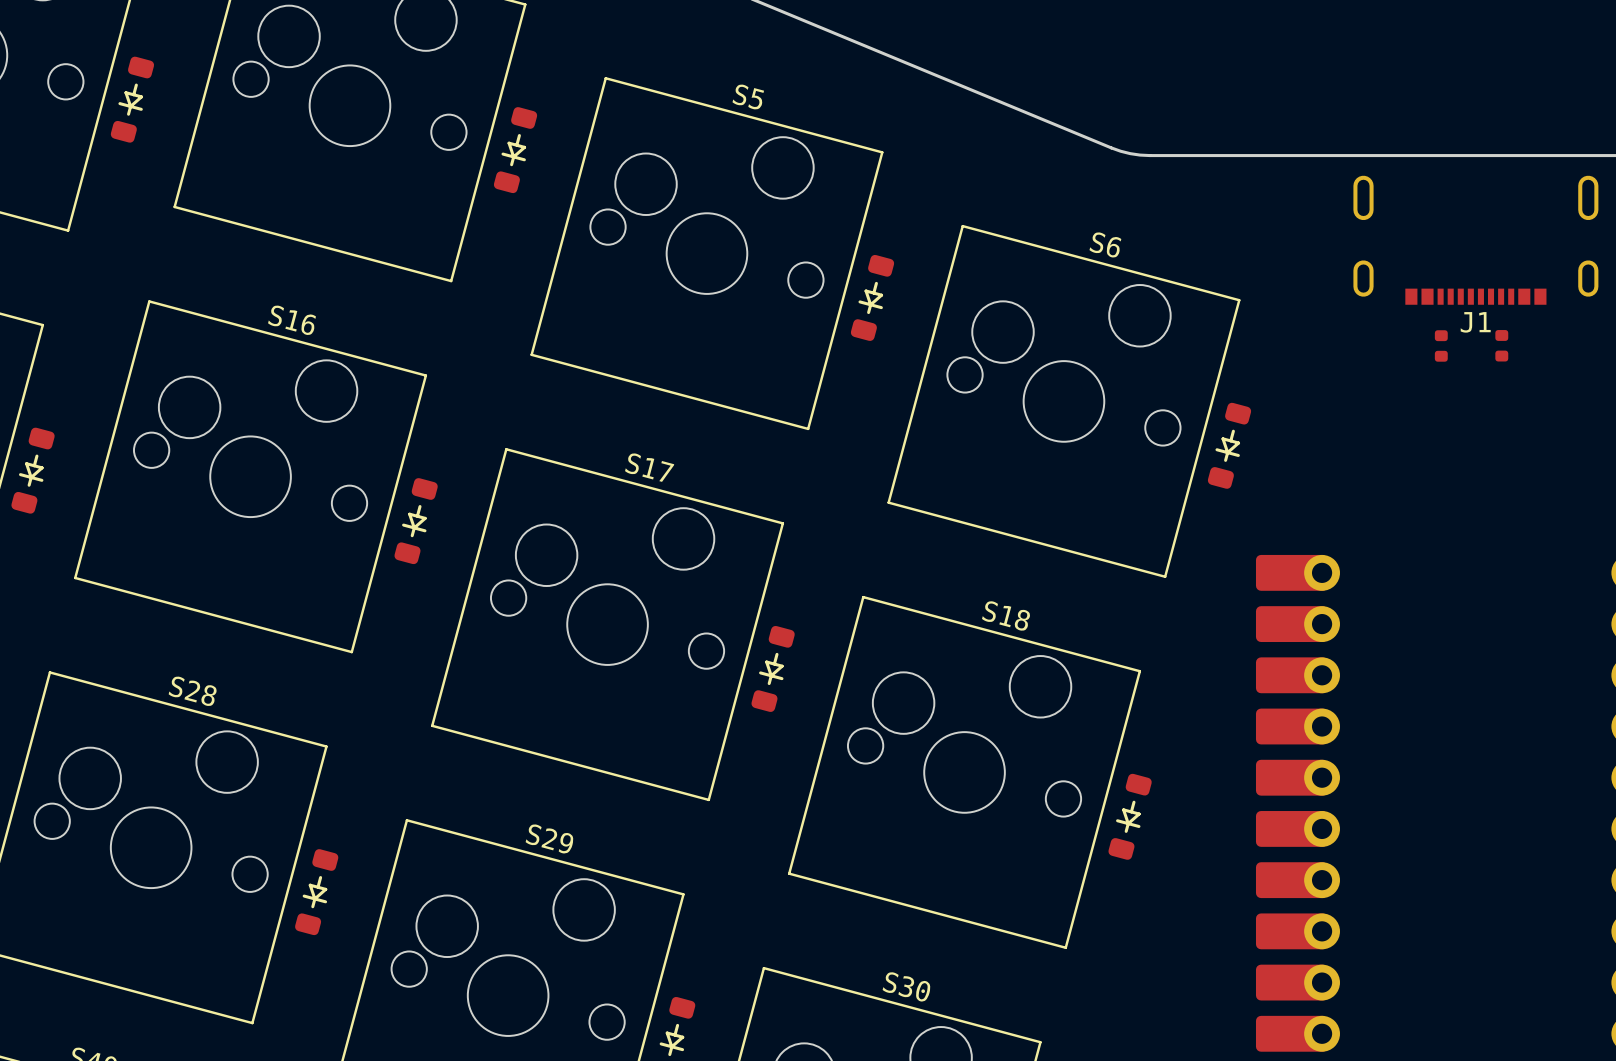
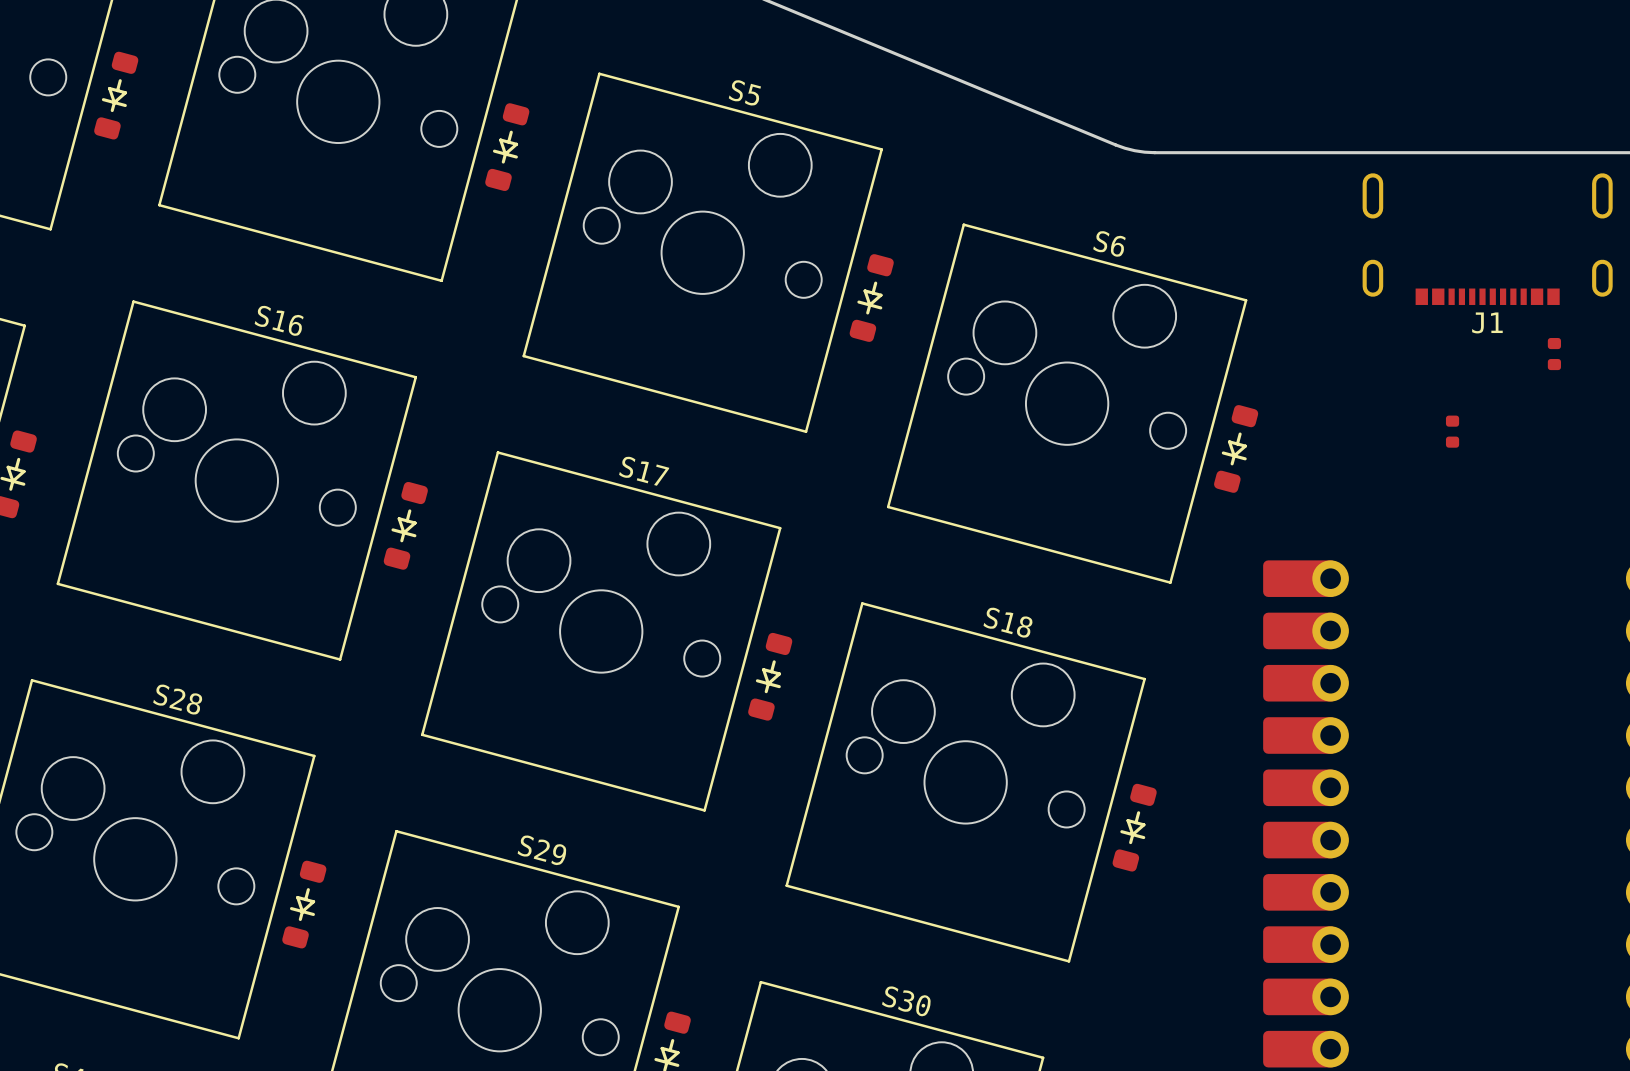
part: (1441, 345) -> none
part position: (1501, 345) -> (1554, 354)
part: none -> (1452, 431)

